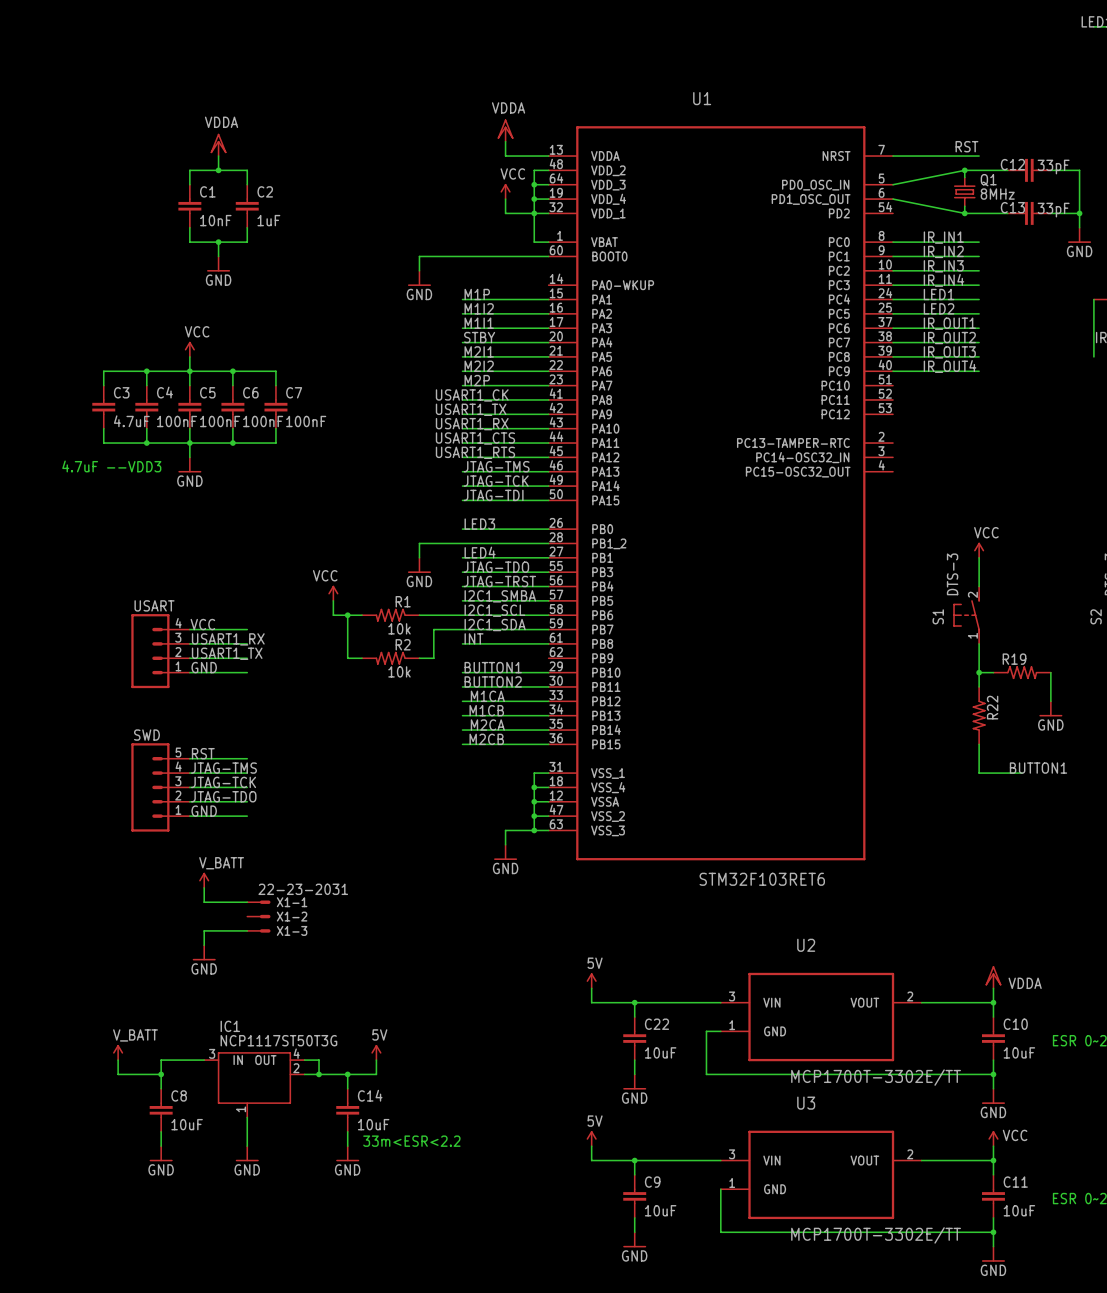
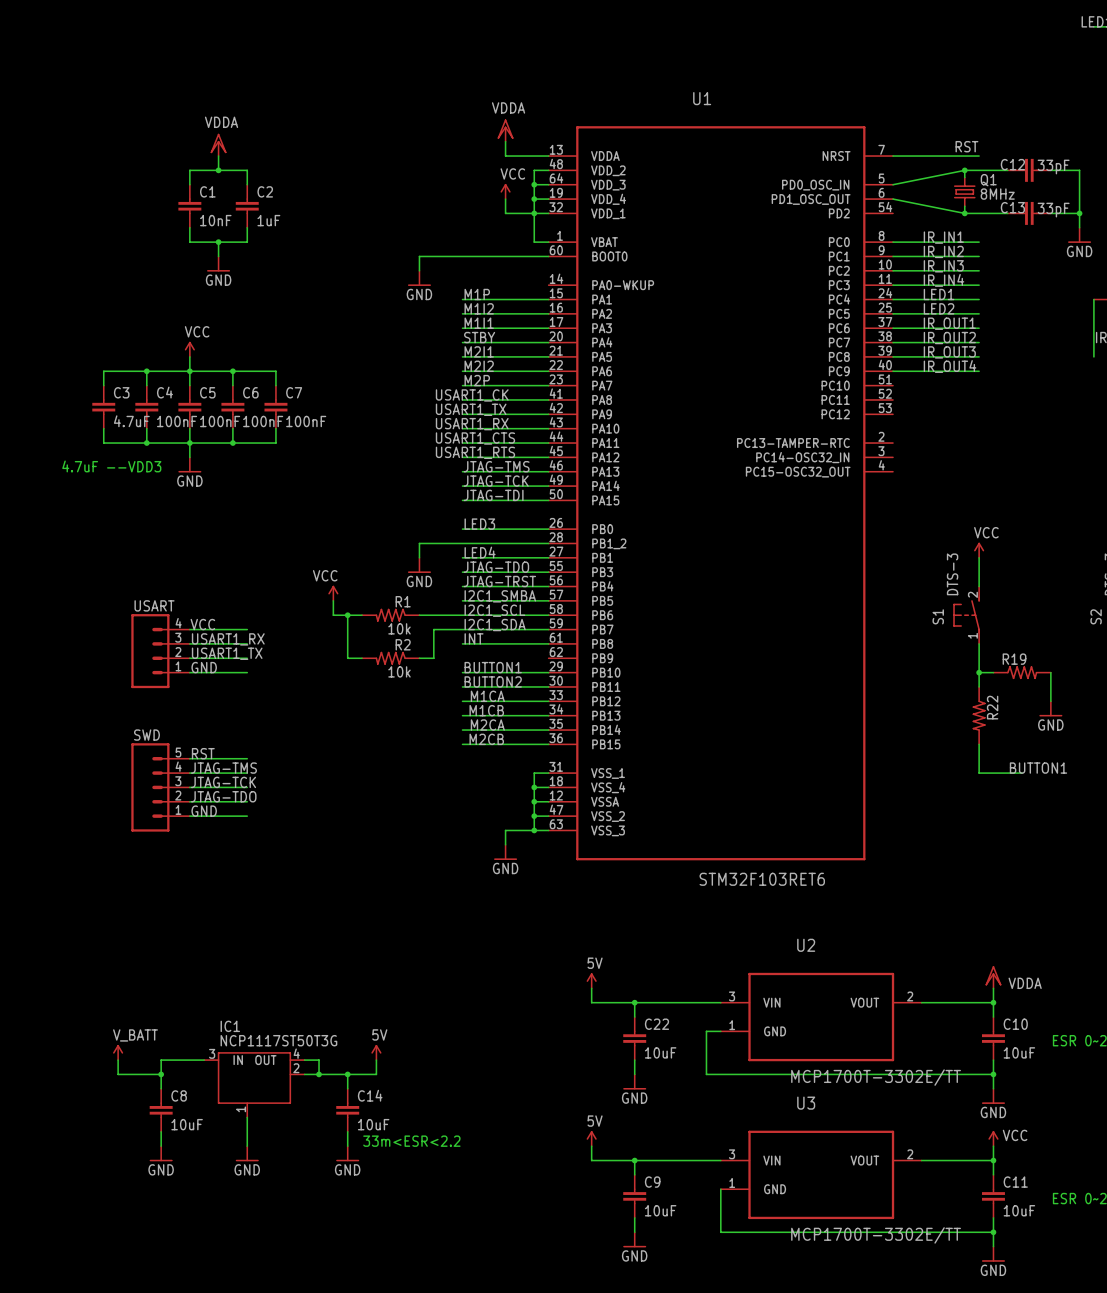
power symbol: V_BATT (204, 880) -> none
wire: (204, 887) (204, 902) (247, 902) -> none
X1-1: 22-23-2031 (258, 902) -> none
X1-2: (258, 916) -> none
wire: (247, 930) (204, 930) (204, 945) -> none
X1-3: (258, 930) -> none
power symbol: GND (204, 952) -> none

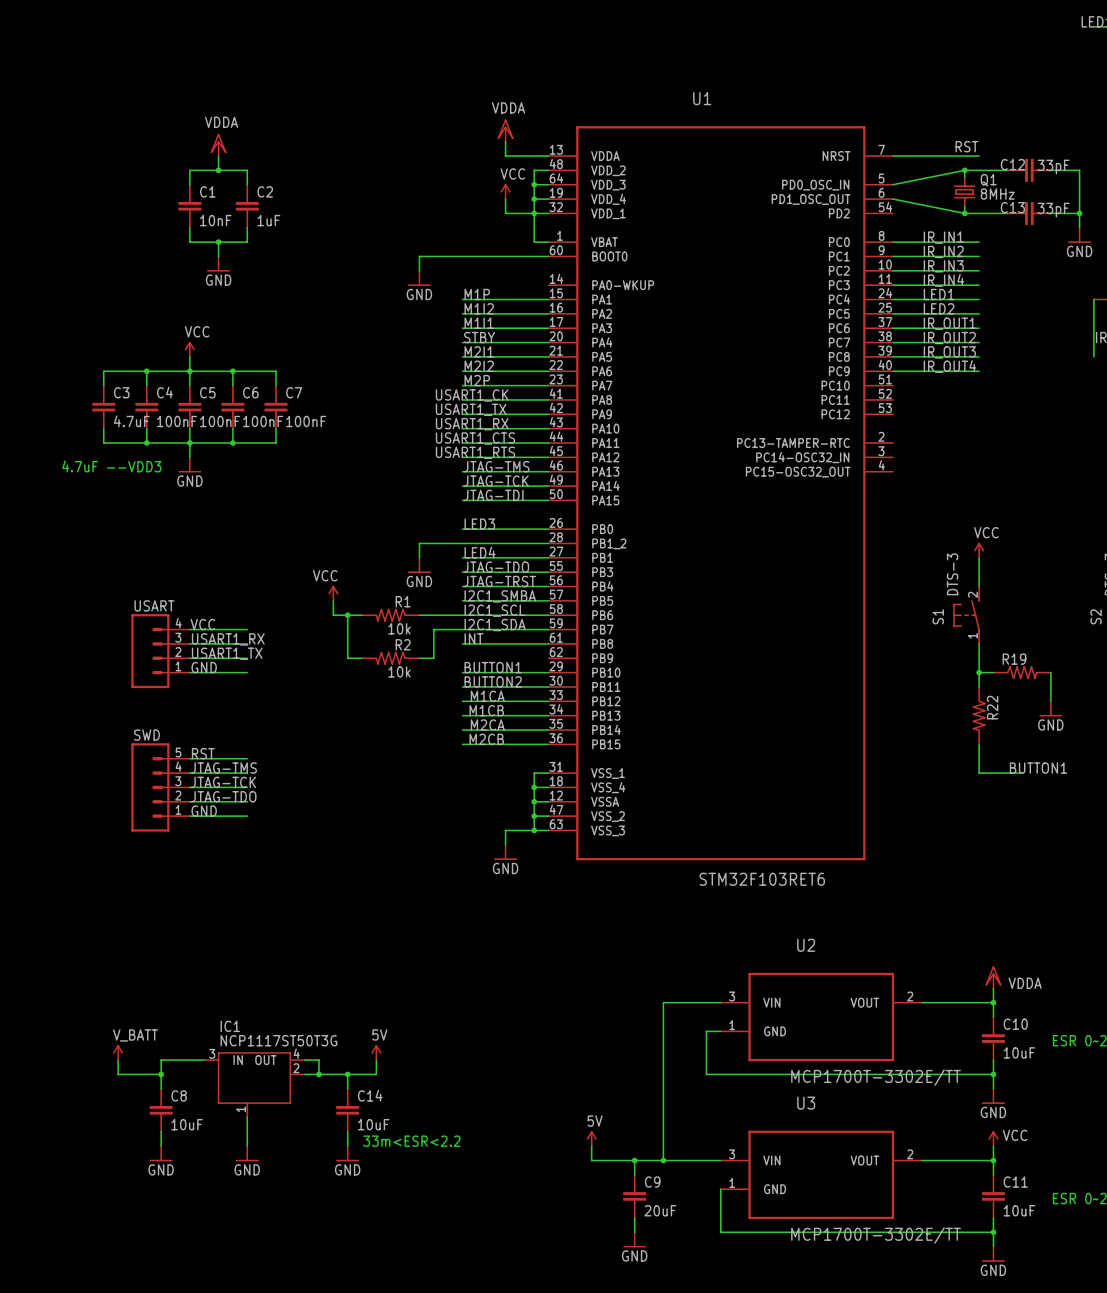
power symbol: 5V (591, 980) -> none
wire: (591, 988) (591, 1002) (663, 1002) -> (663, 1160) (663, 1002)
wire: (634, 1002) (634, 1017) -> none
junction: (634, 1002) -> none
C22: 10uF (634, 1038) -> none
wire: (634, 1060) (634, 1074) -> none
power symbol: GND (634, 1081) -> none
junction: none -> (663, 1160)
C9 value: 10uF (660, 1210) -> 20uF (660, 1210)

